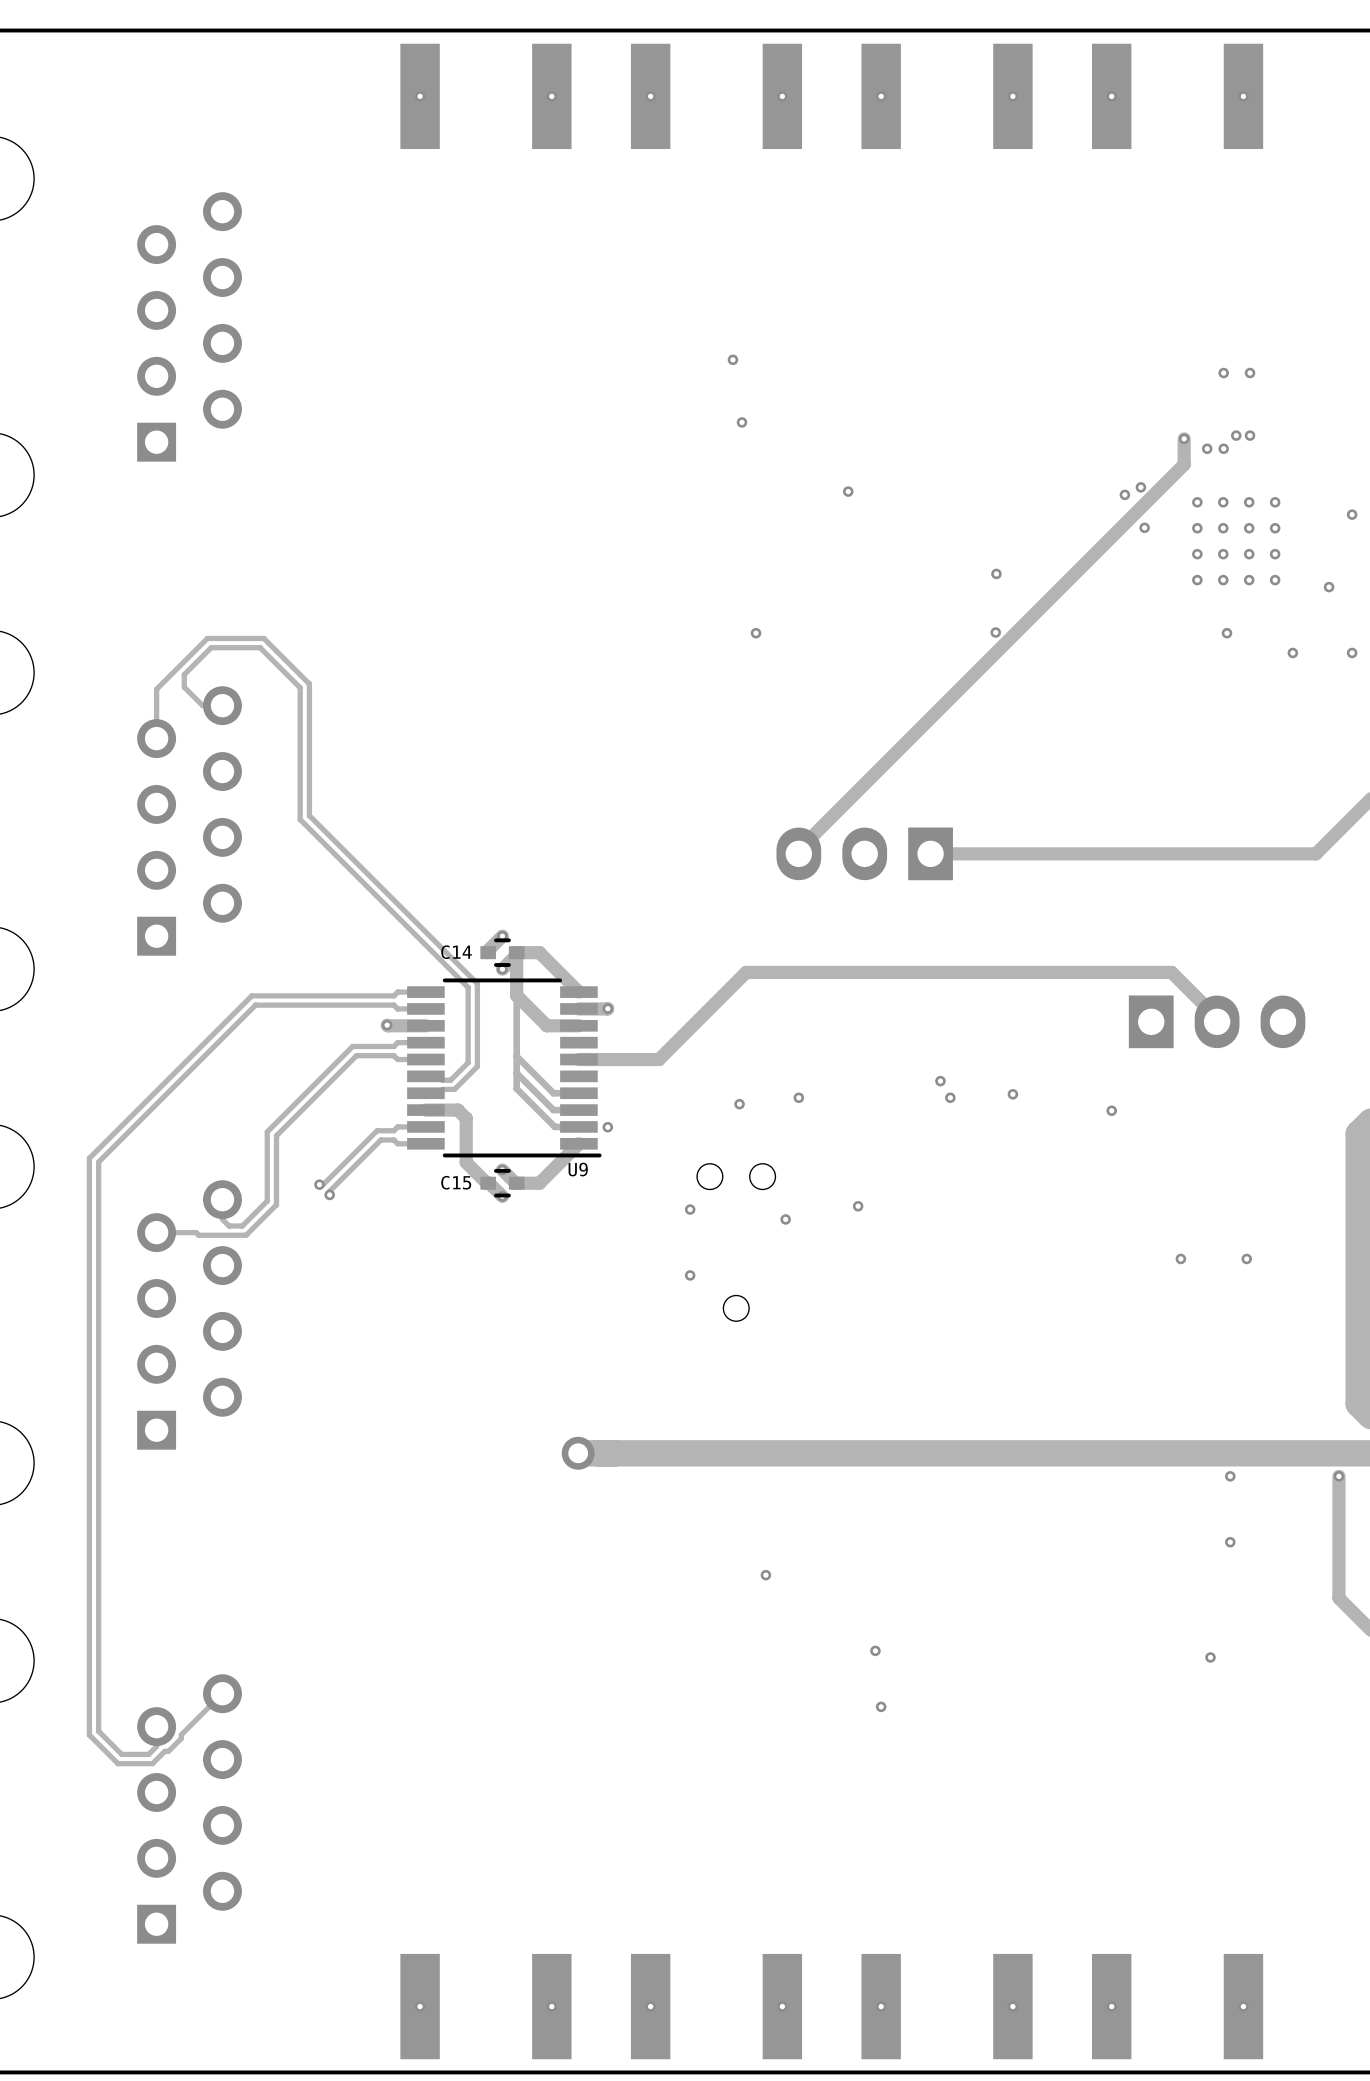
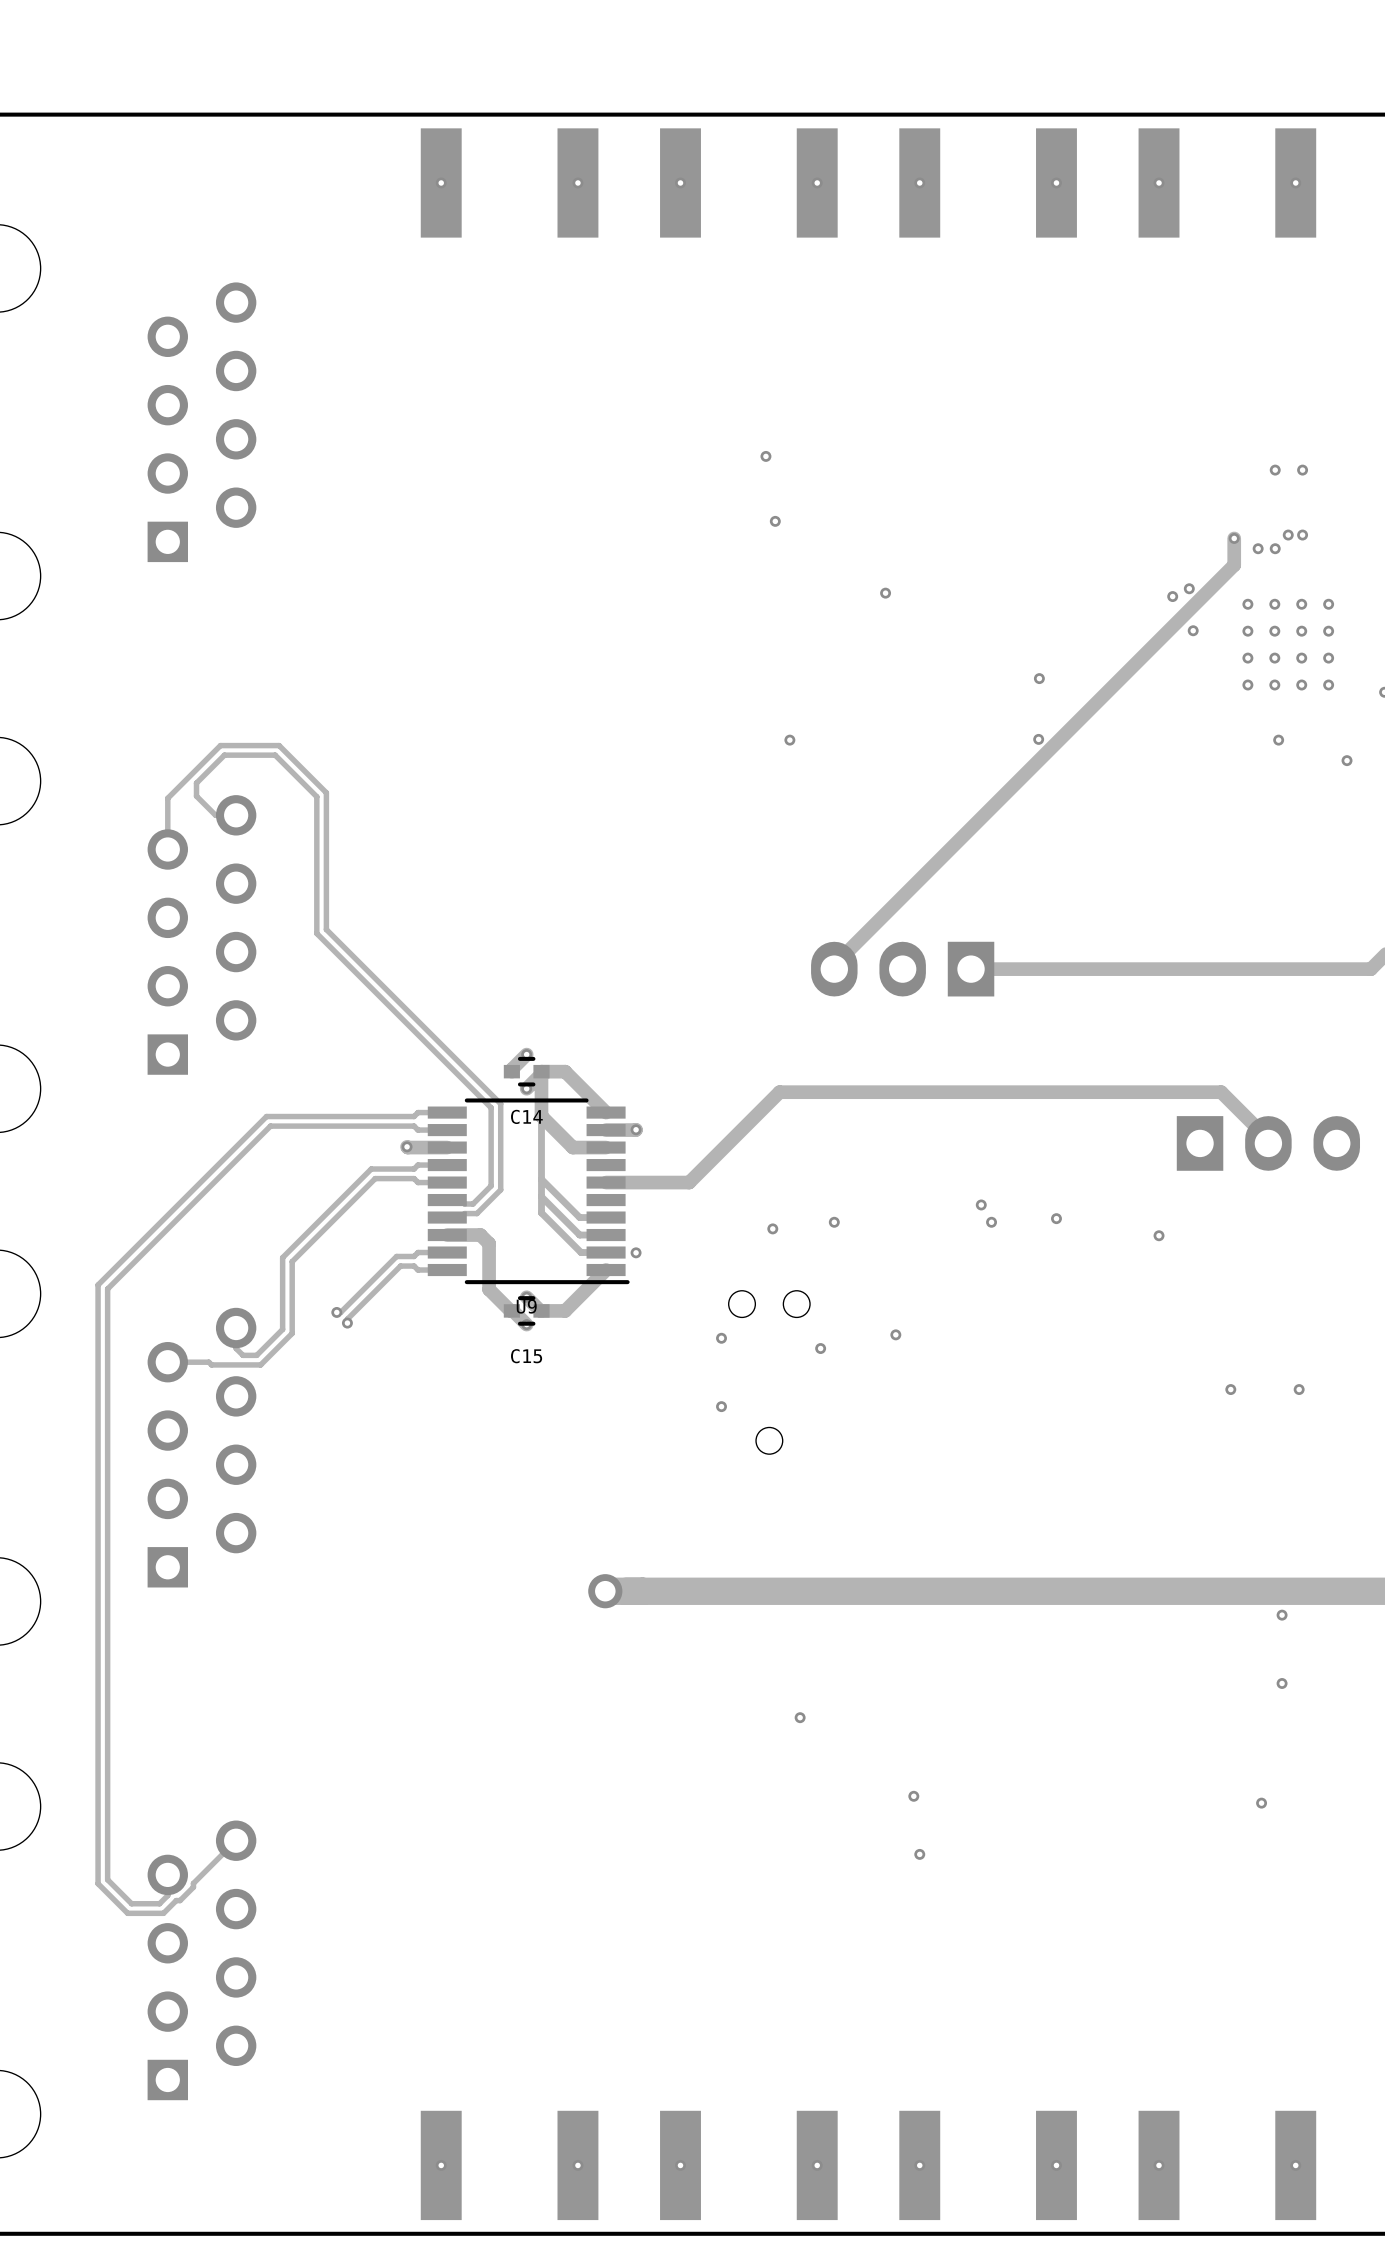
C14 name position: C14 (456, 952) -> C14 (526, 1116)
U9 name position: U9 (578, 1169) -> U9 (526, 1306)
C15 name position: C15 (456, 1182) -> C15 (526, 1356)

